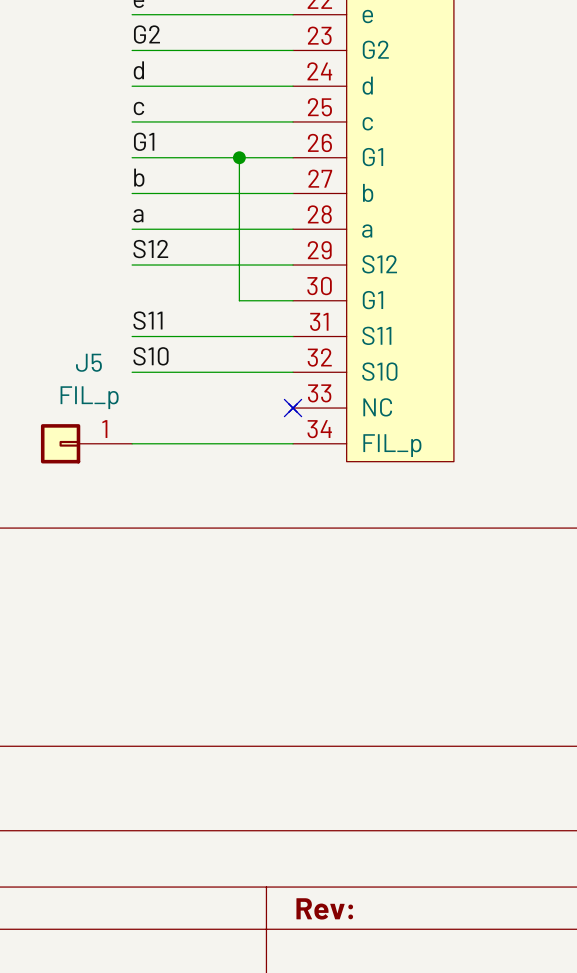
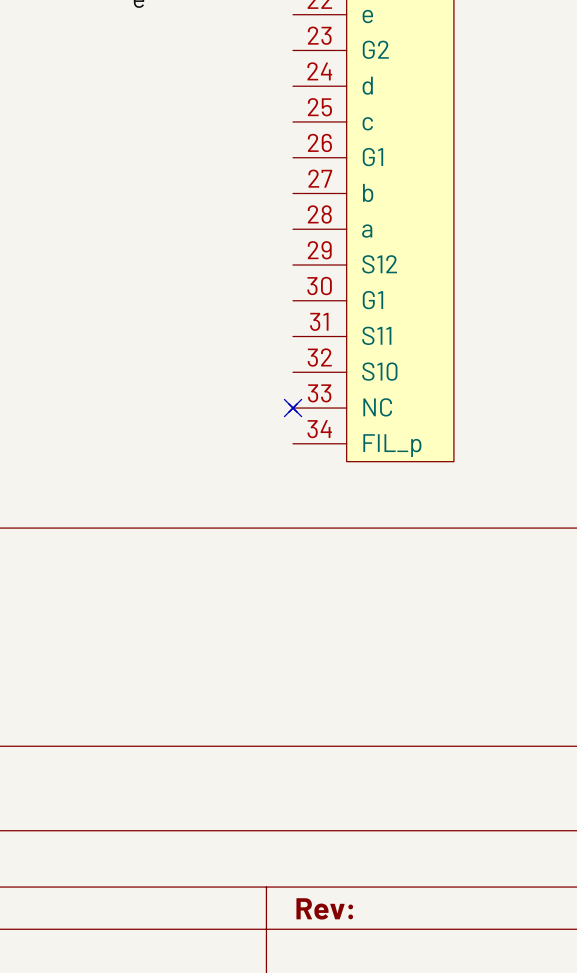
wire: (132, 14) (293, 14) -> none
label: G2 (146, 34) -> none
wire: (132, 50) (293, 50) -> none
label: d (138, 70) -> none
wire: (132, 86) (293, 86) -> none
label: c (138, 108) -> none
wire: (132, 121) (293, 121) -> none
label: G1 (144, 141) -> none
wire: (132, 157) (293, 157) -> none
wire: (239, 157) (239, 300) (293, 300) -> none
junction: (239, 157) -> none
label: b (139, 177) -> none
wire: (132, 193) (293, 193) -> none
label: a (138, 215) -> none
wire: (132, 229) (293, 229) -> none
label: S12 (150, 249) -> none
wire: (132, 265) (293, 265) -> none
label: S11 (147, 320) -> none
wire: (132, 336) (293, 336) -> none
label: S10 (151, 356) -> none
wire: (132, 372) (293, 372) -> none
J5: FIL_p (86, 443) -> none
wire: (132, 443) (293, 443) -> none

